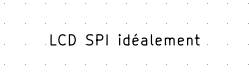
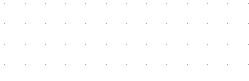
text: LCD SPI idéalement (125, 39) -> none

